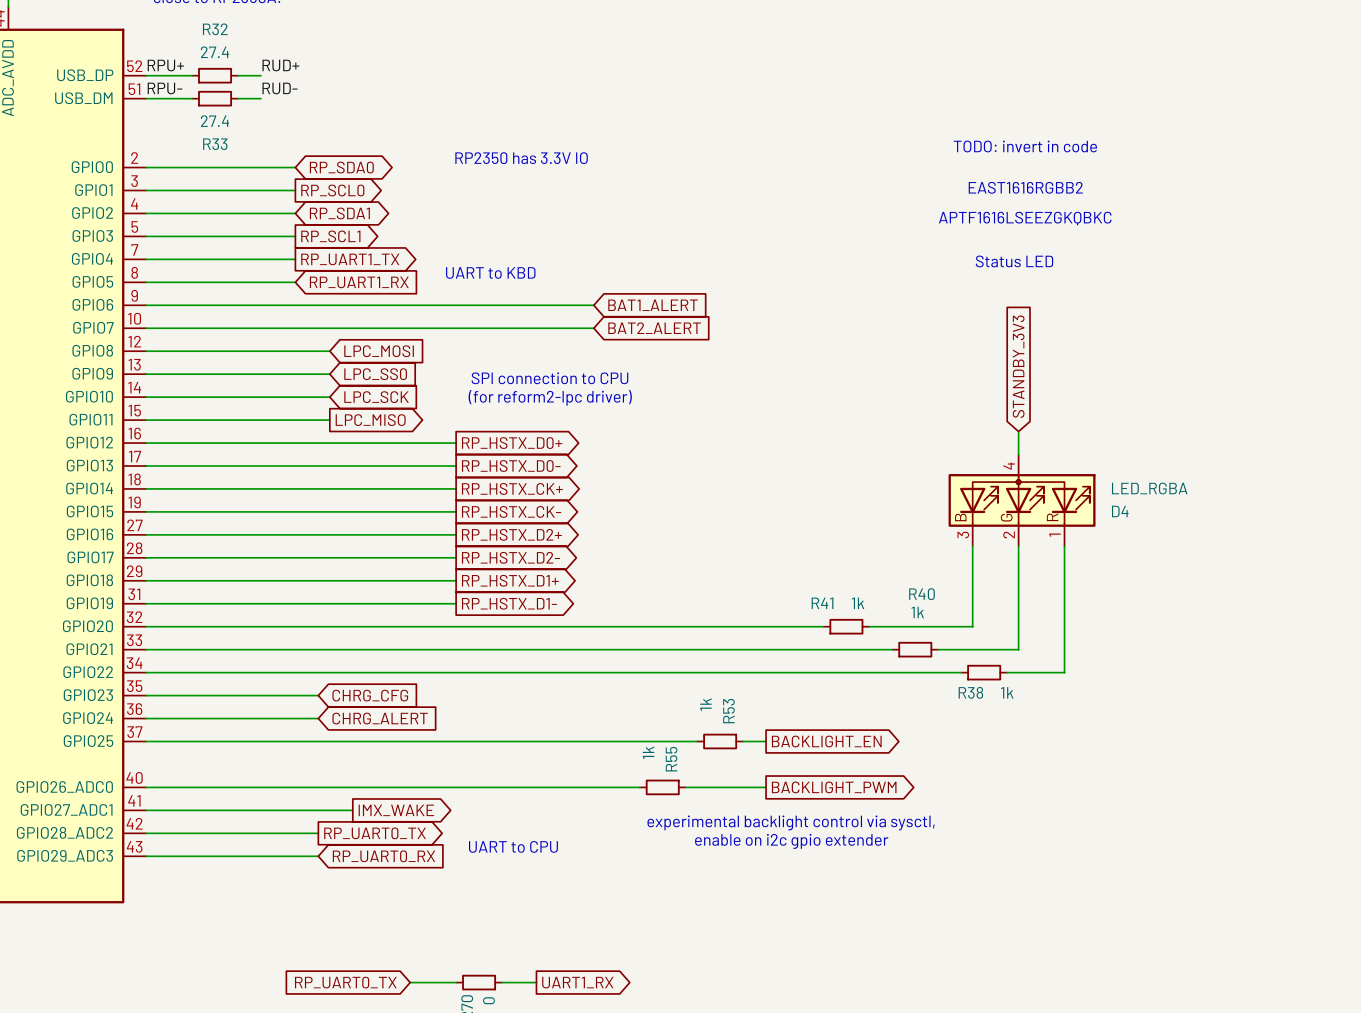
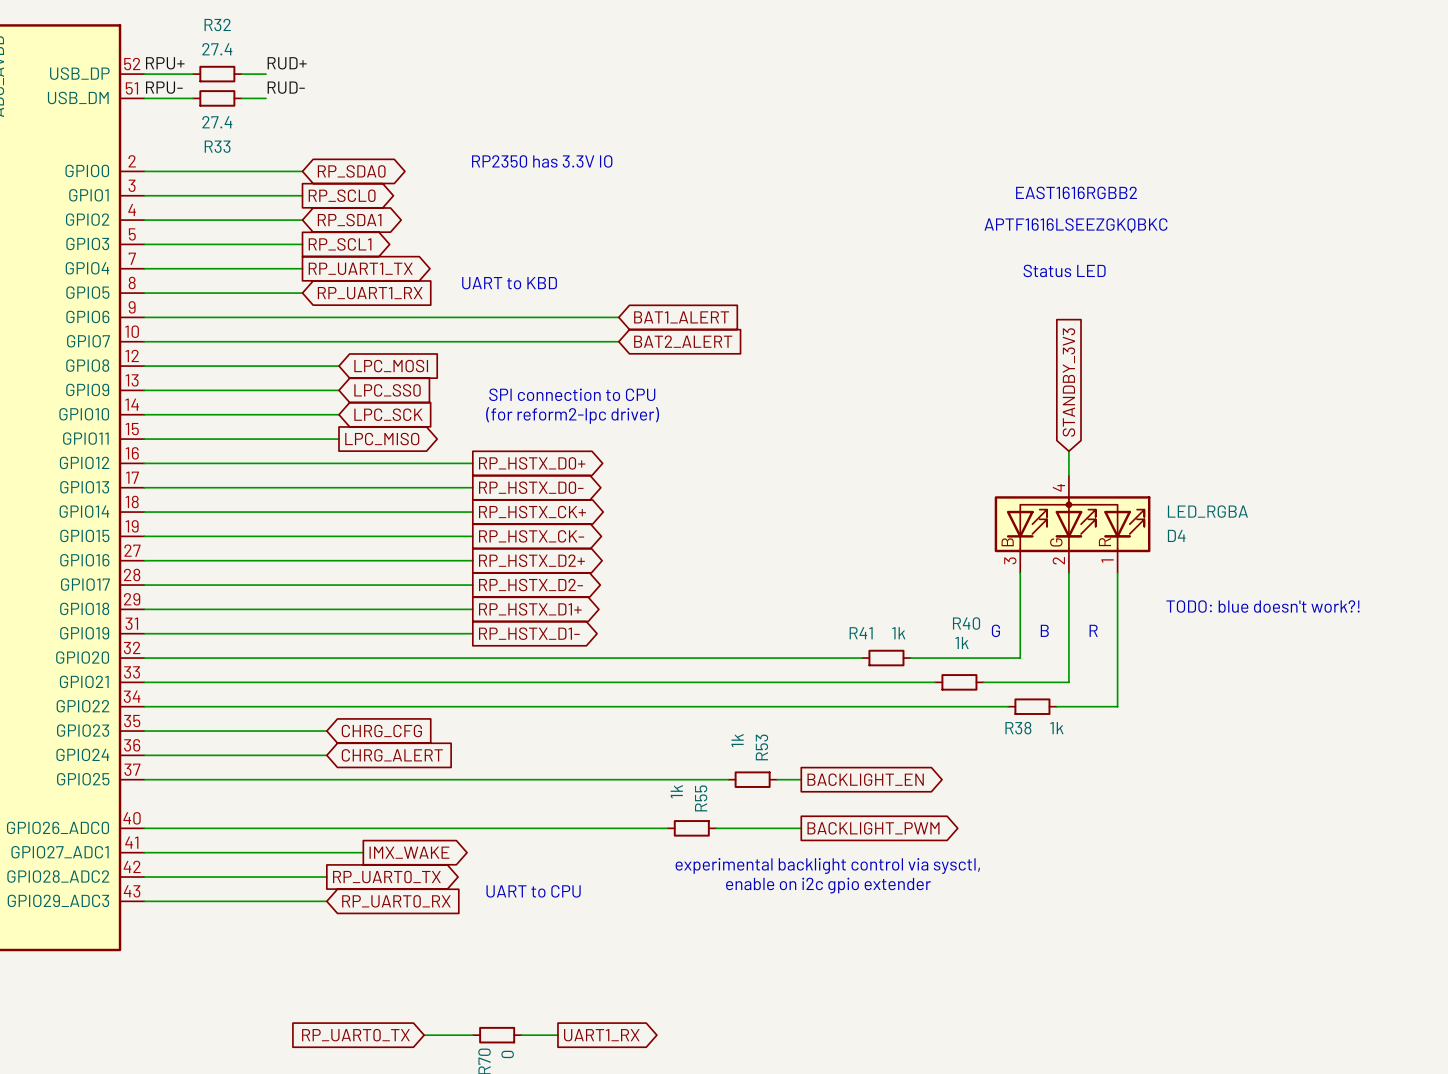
text: TODO: invert in code (1025, 146) -> none
text: none -> TODO: blue doesn't work?! (1263, 606)
text: none -> G (995, 630)
text: none -> B (1044, 630)
text: none -> R (1093, 630)

